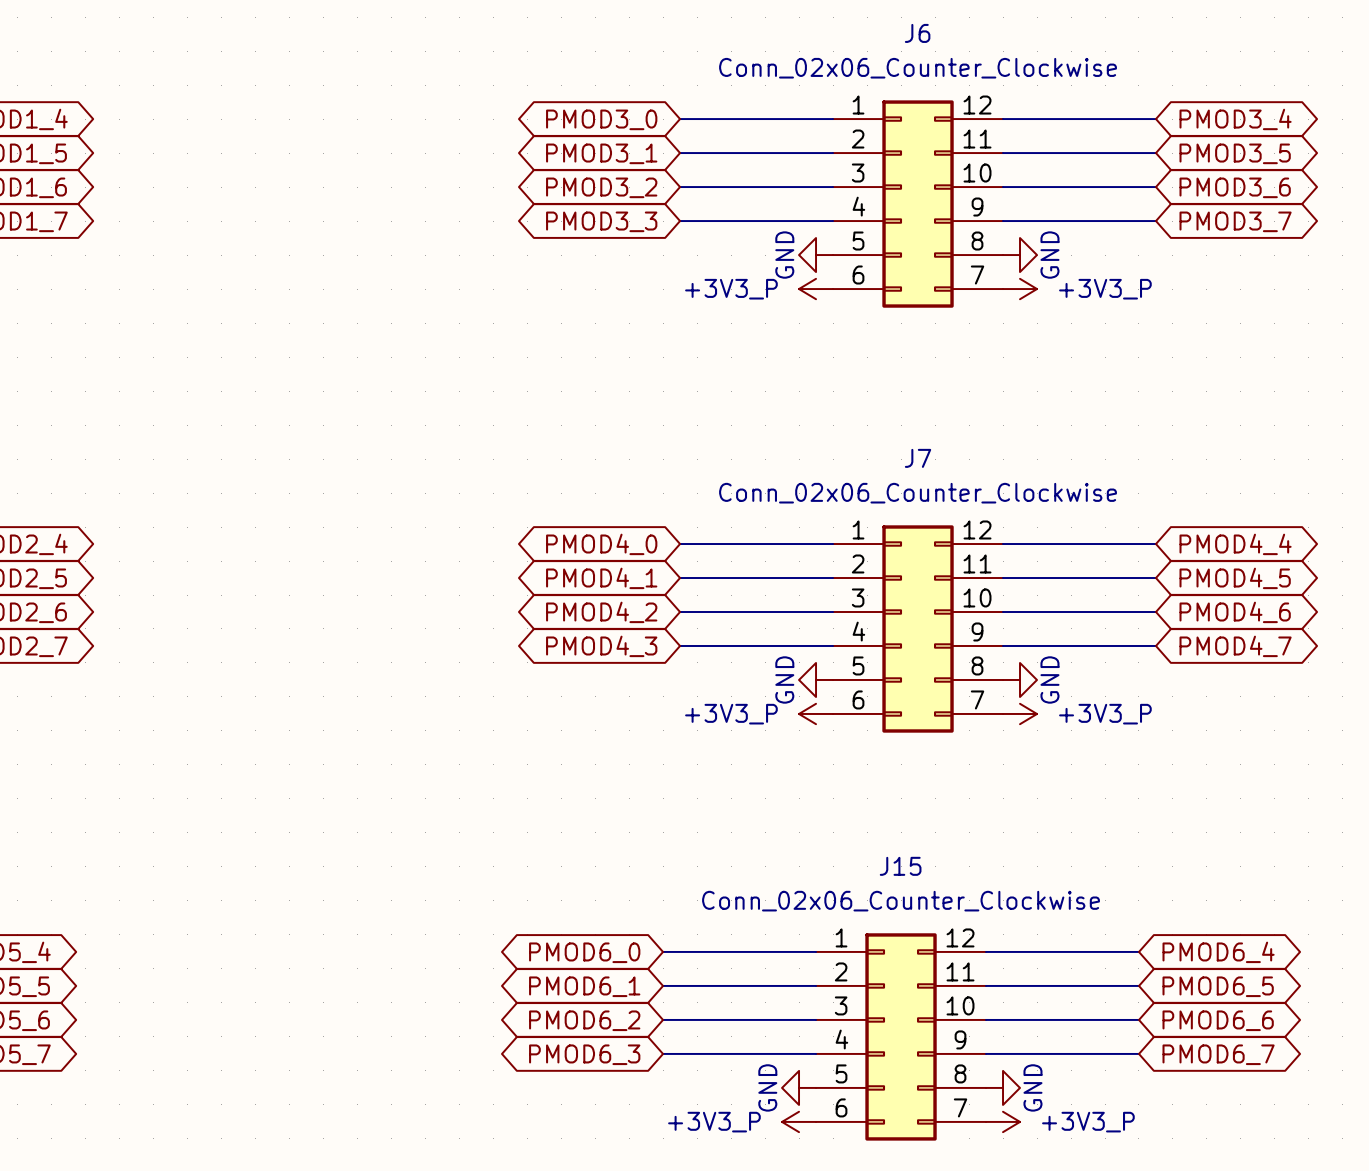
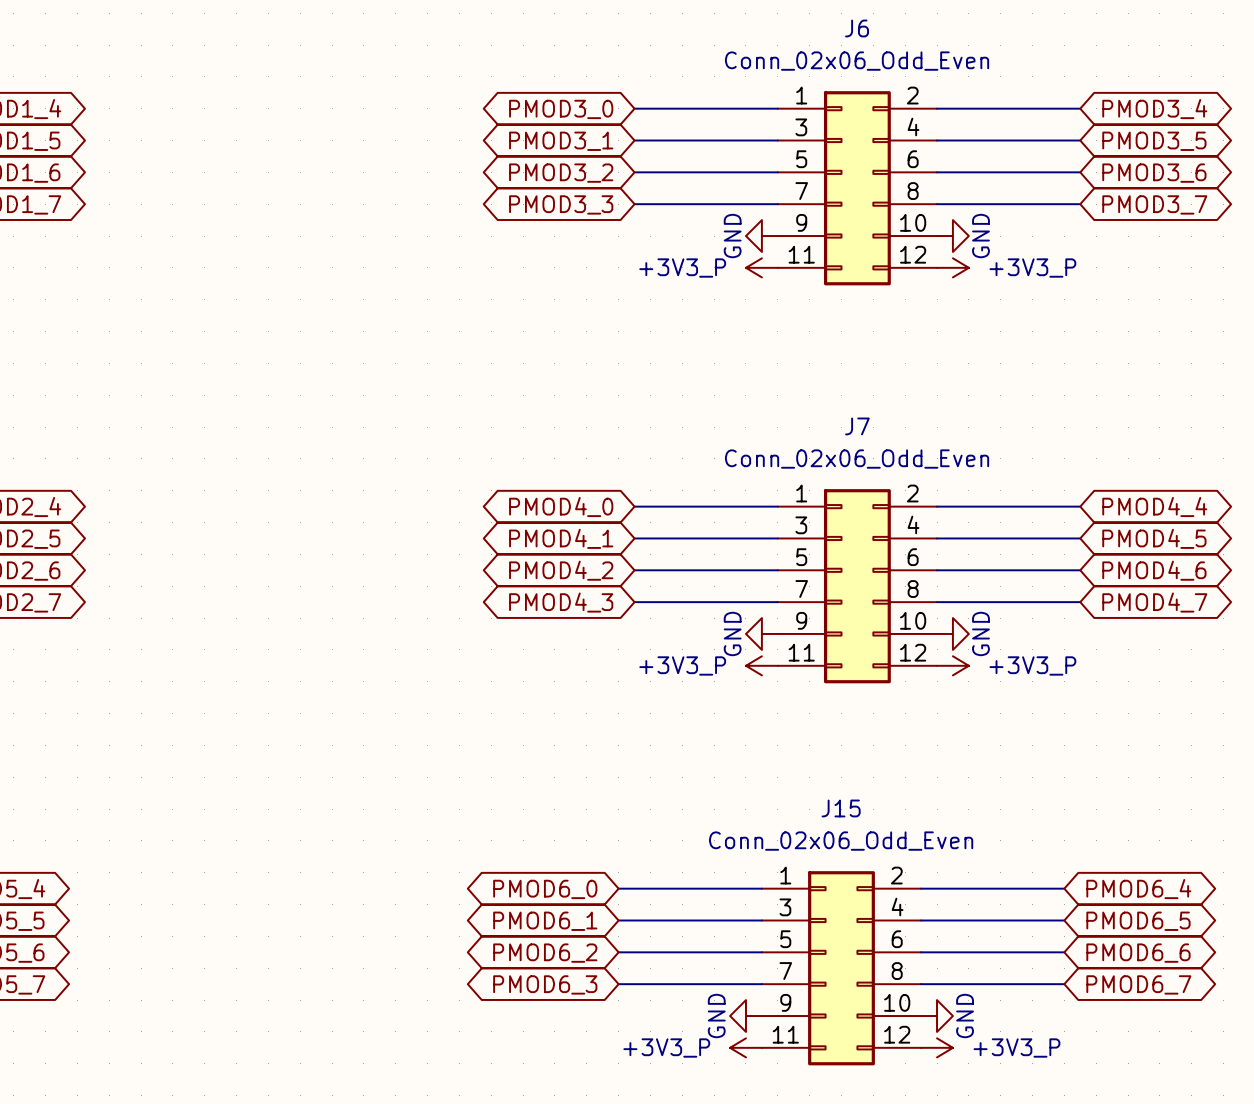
J6 value: Conn_02x06_Counter_Clockwise (918, 68) -> Conn_02x06_Odd_Even (857, 61)
J6 symbol: [833, 100, 1004, 308] -> [777, 91, 938, 286]
J7 value: Conn_02x06_Counter_Clockwise (918, 493) -> Conn_02x06_Odd_Even (857, 459)
J7 symbol: [833, 525, 1004, 733] -> [777, 489, 938, 684]
J15 value: Conn_02x06_Counter_Clockwise (901, 901) -> Conn_02x06_Odd_Even (841, 841)
J15 symbol: [816, 933, 987, 1141] -> [761, 871, 922, 1066]

